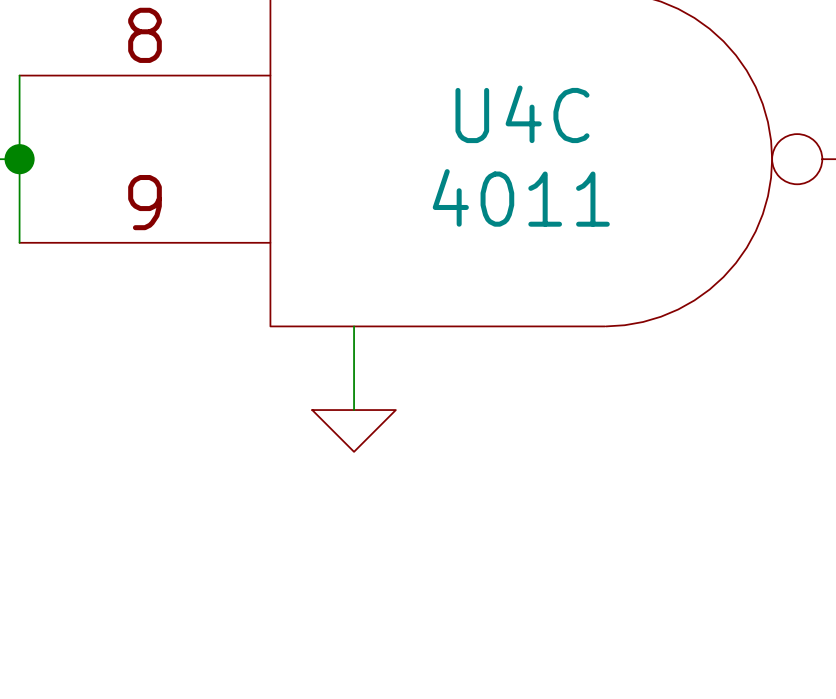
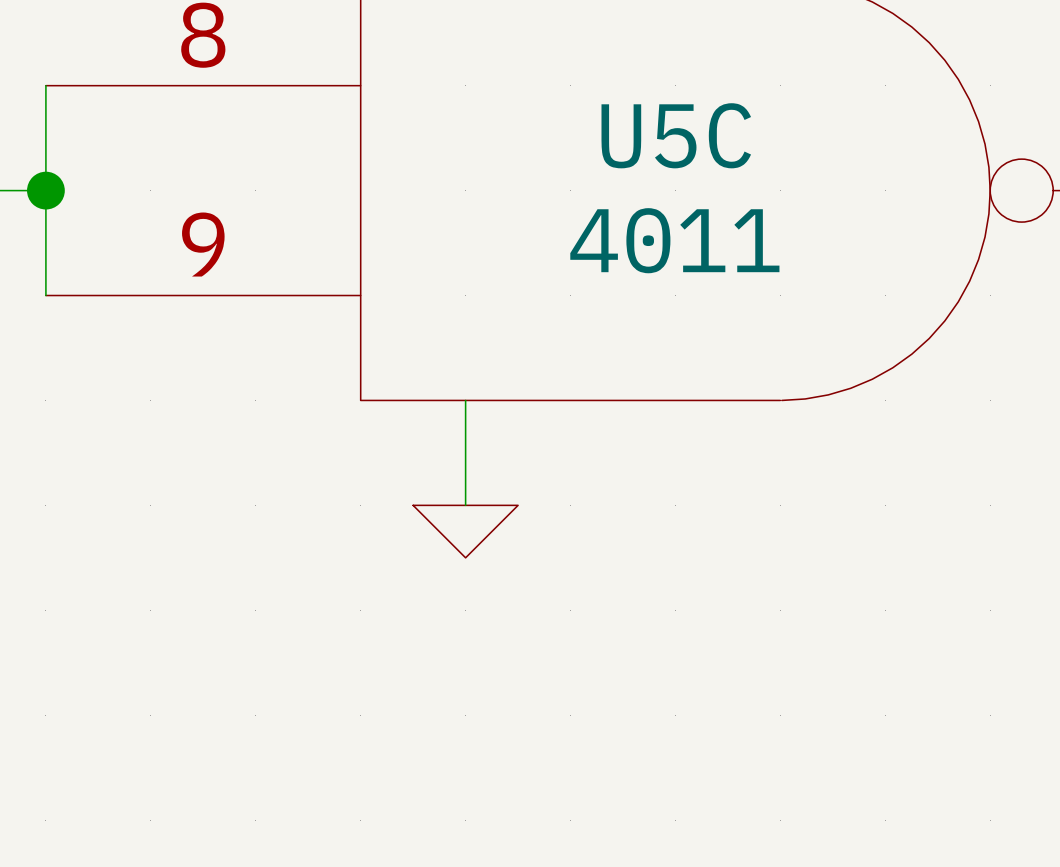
U4C name: U4C (522, 114) -> U5C (676, 135)

